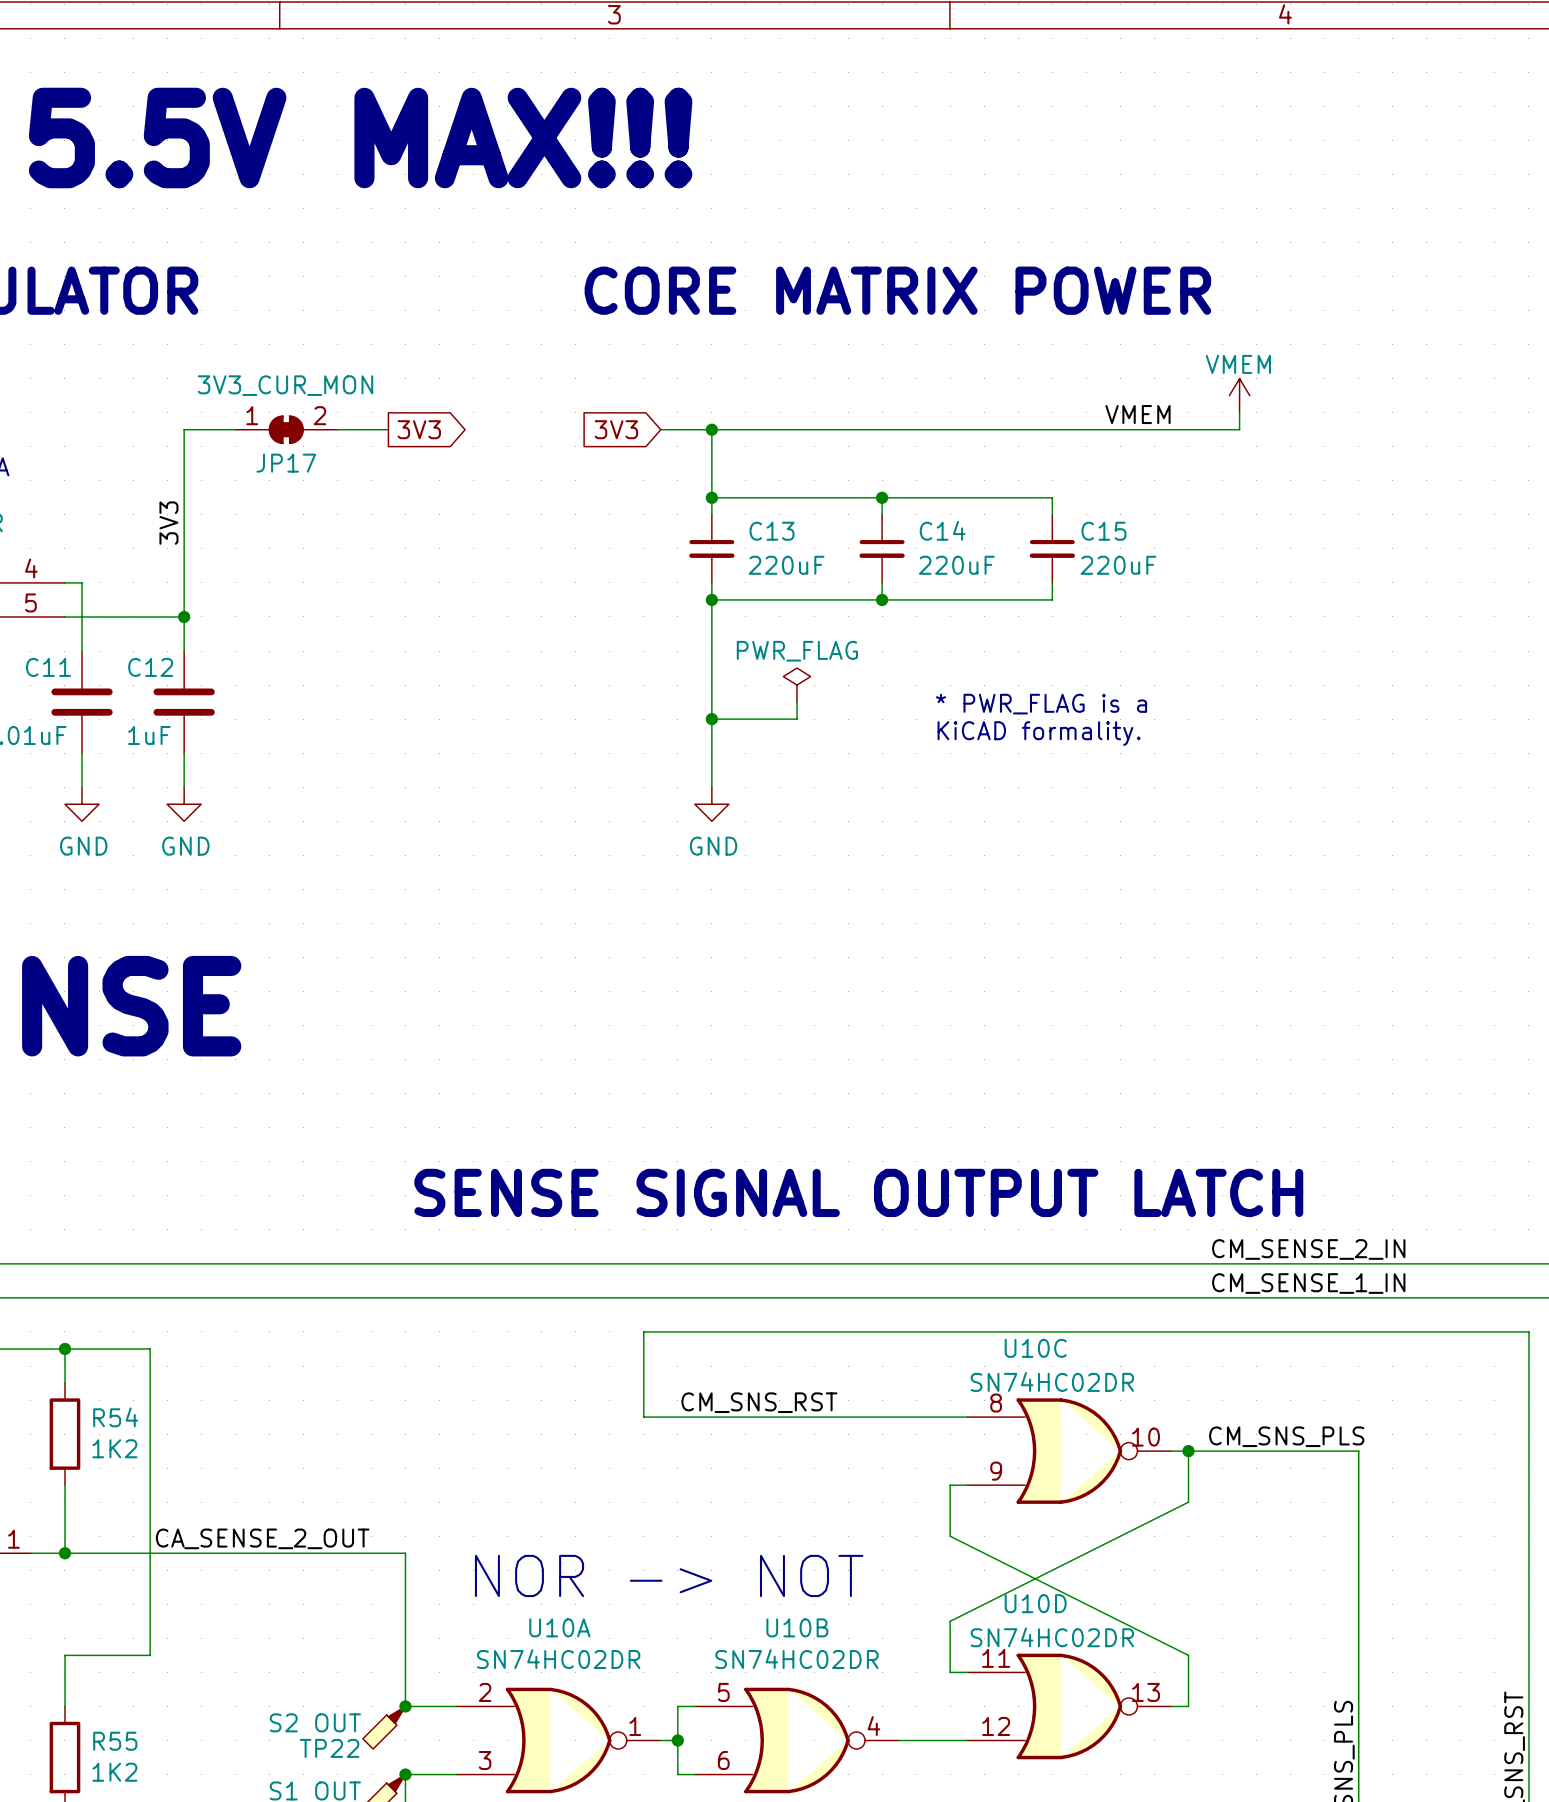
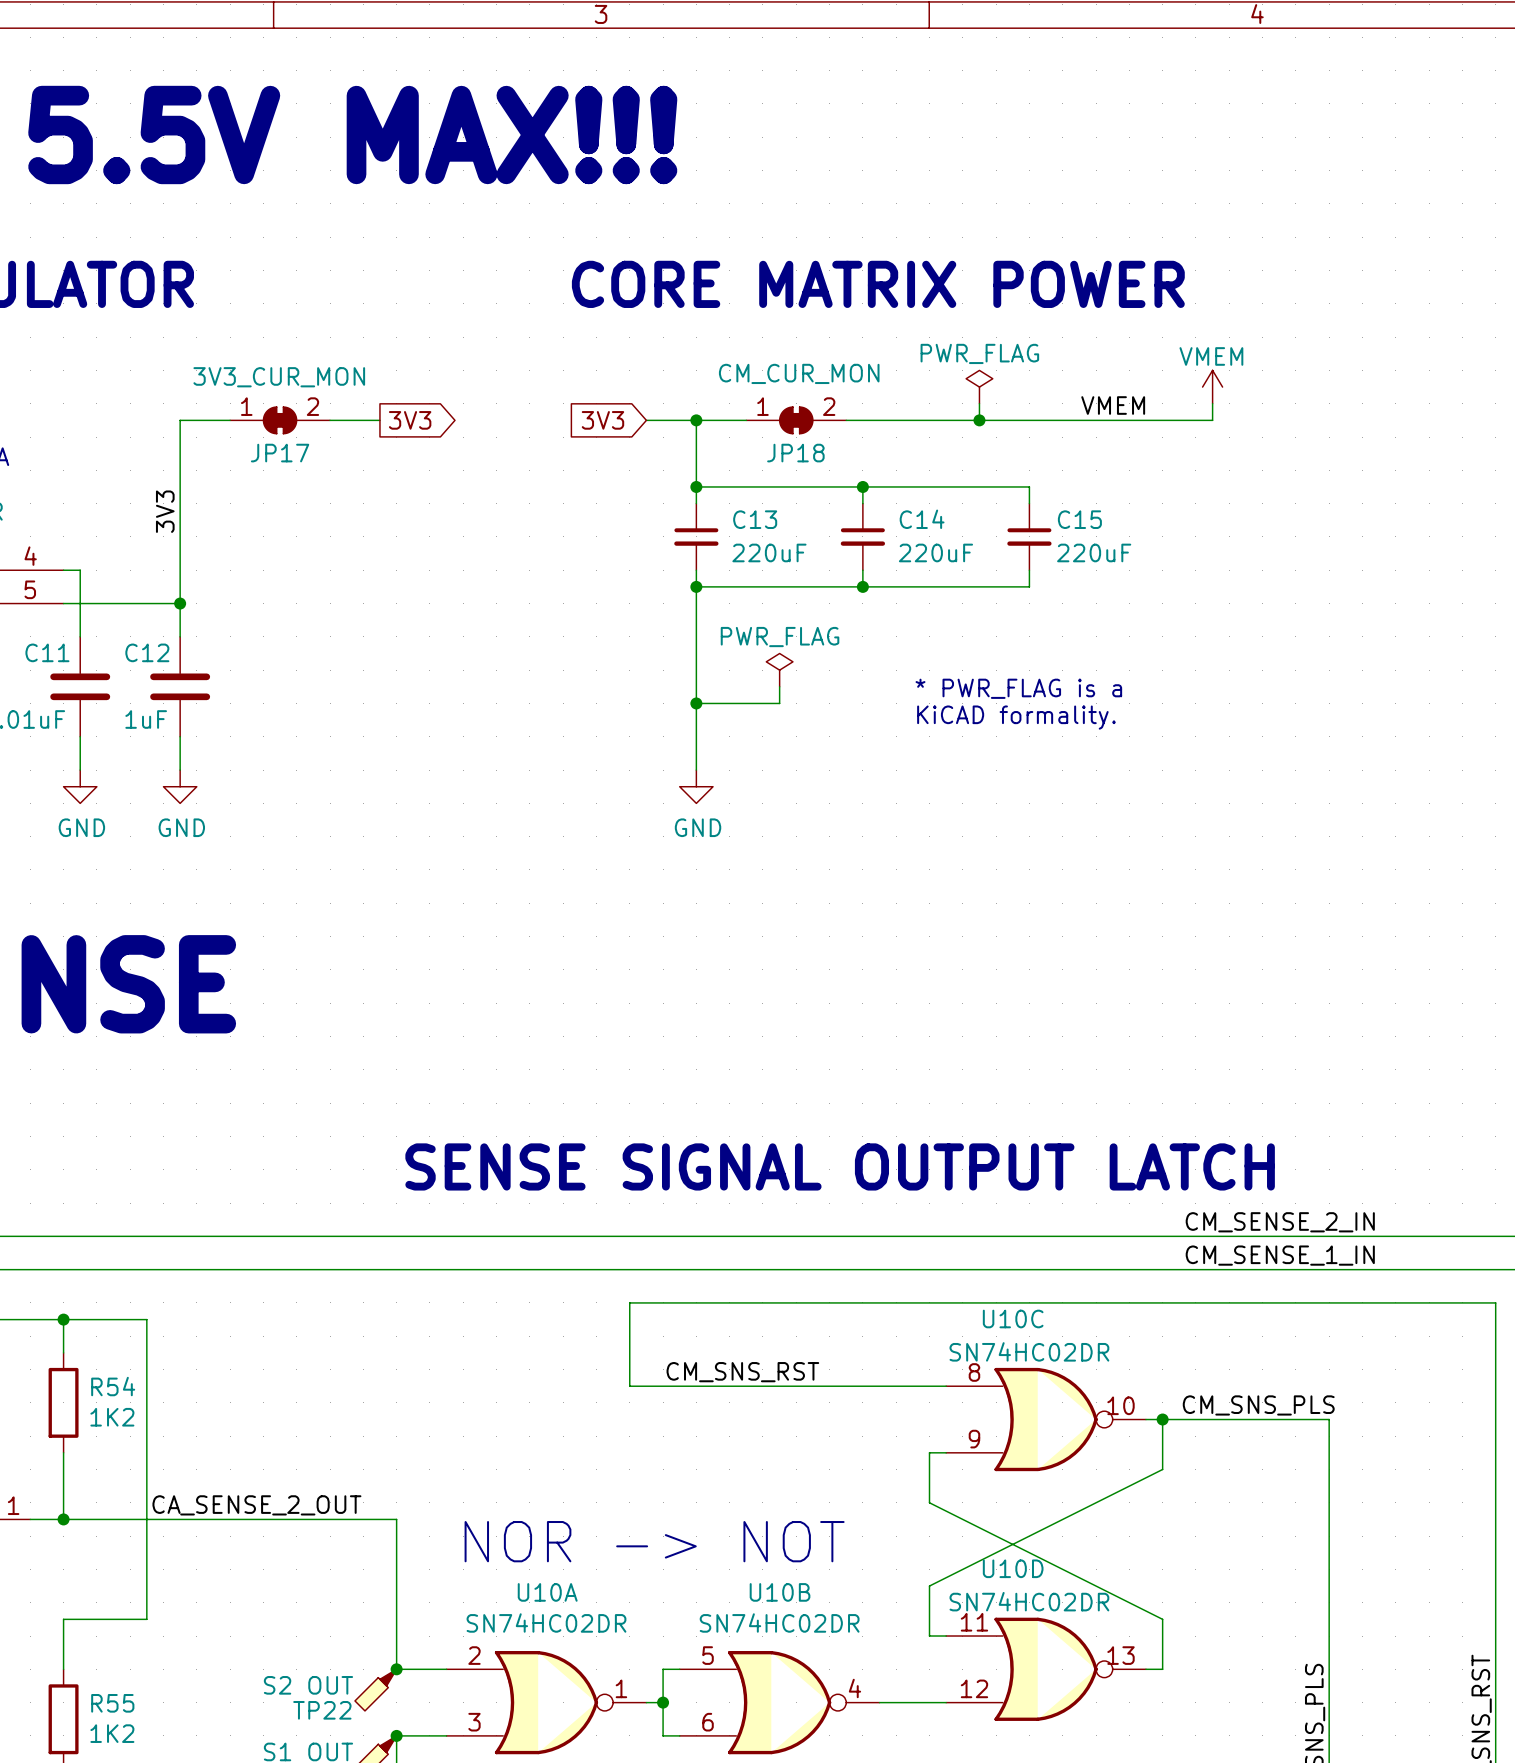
power symbol: none -> PWR_FLAG (979, 387)
wire: none -> (979, 403) (979, 420)
JP18: none -> CM_CUR_MON (796, 420)
junction: none -> (979, 420)

